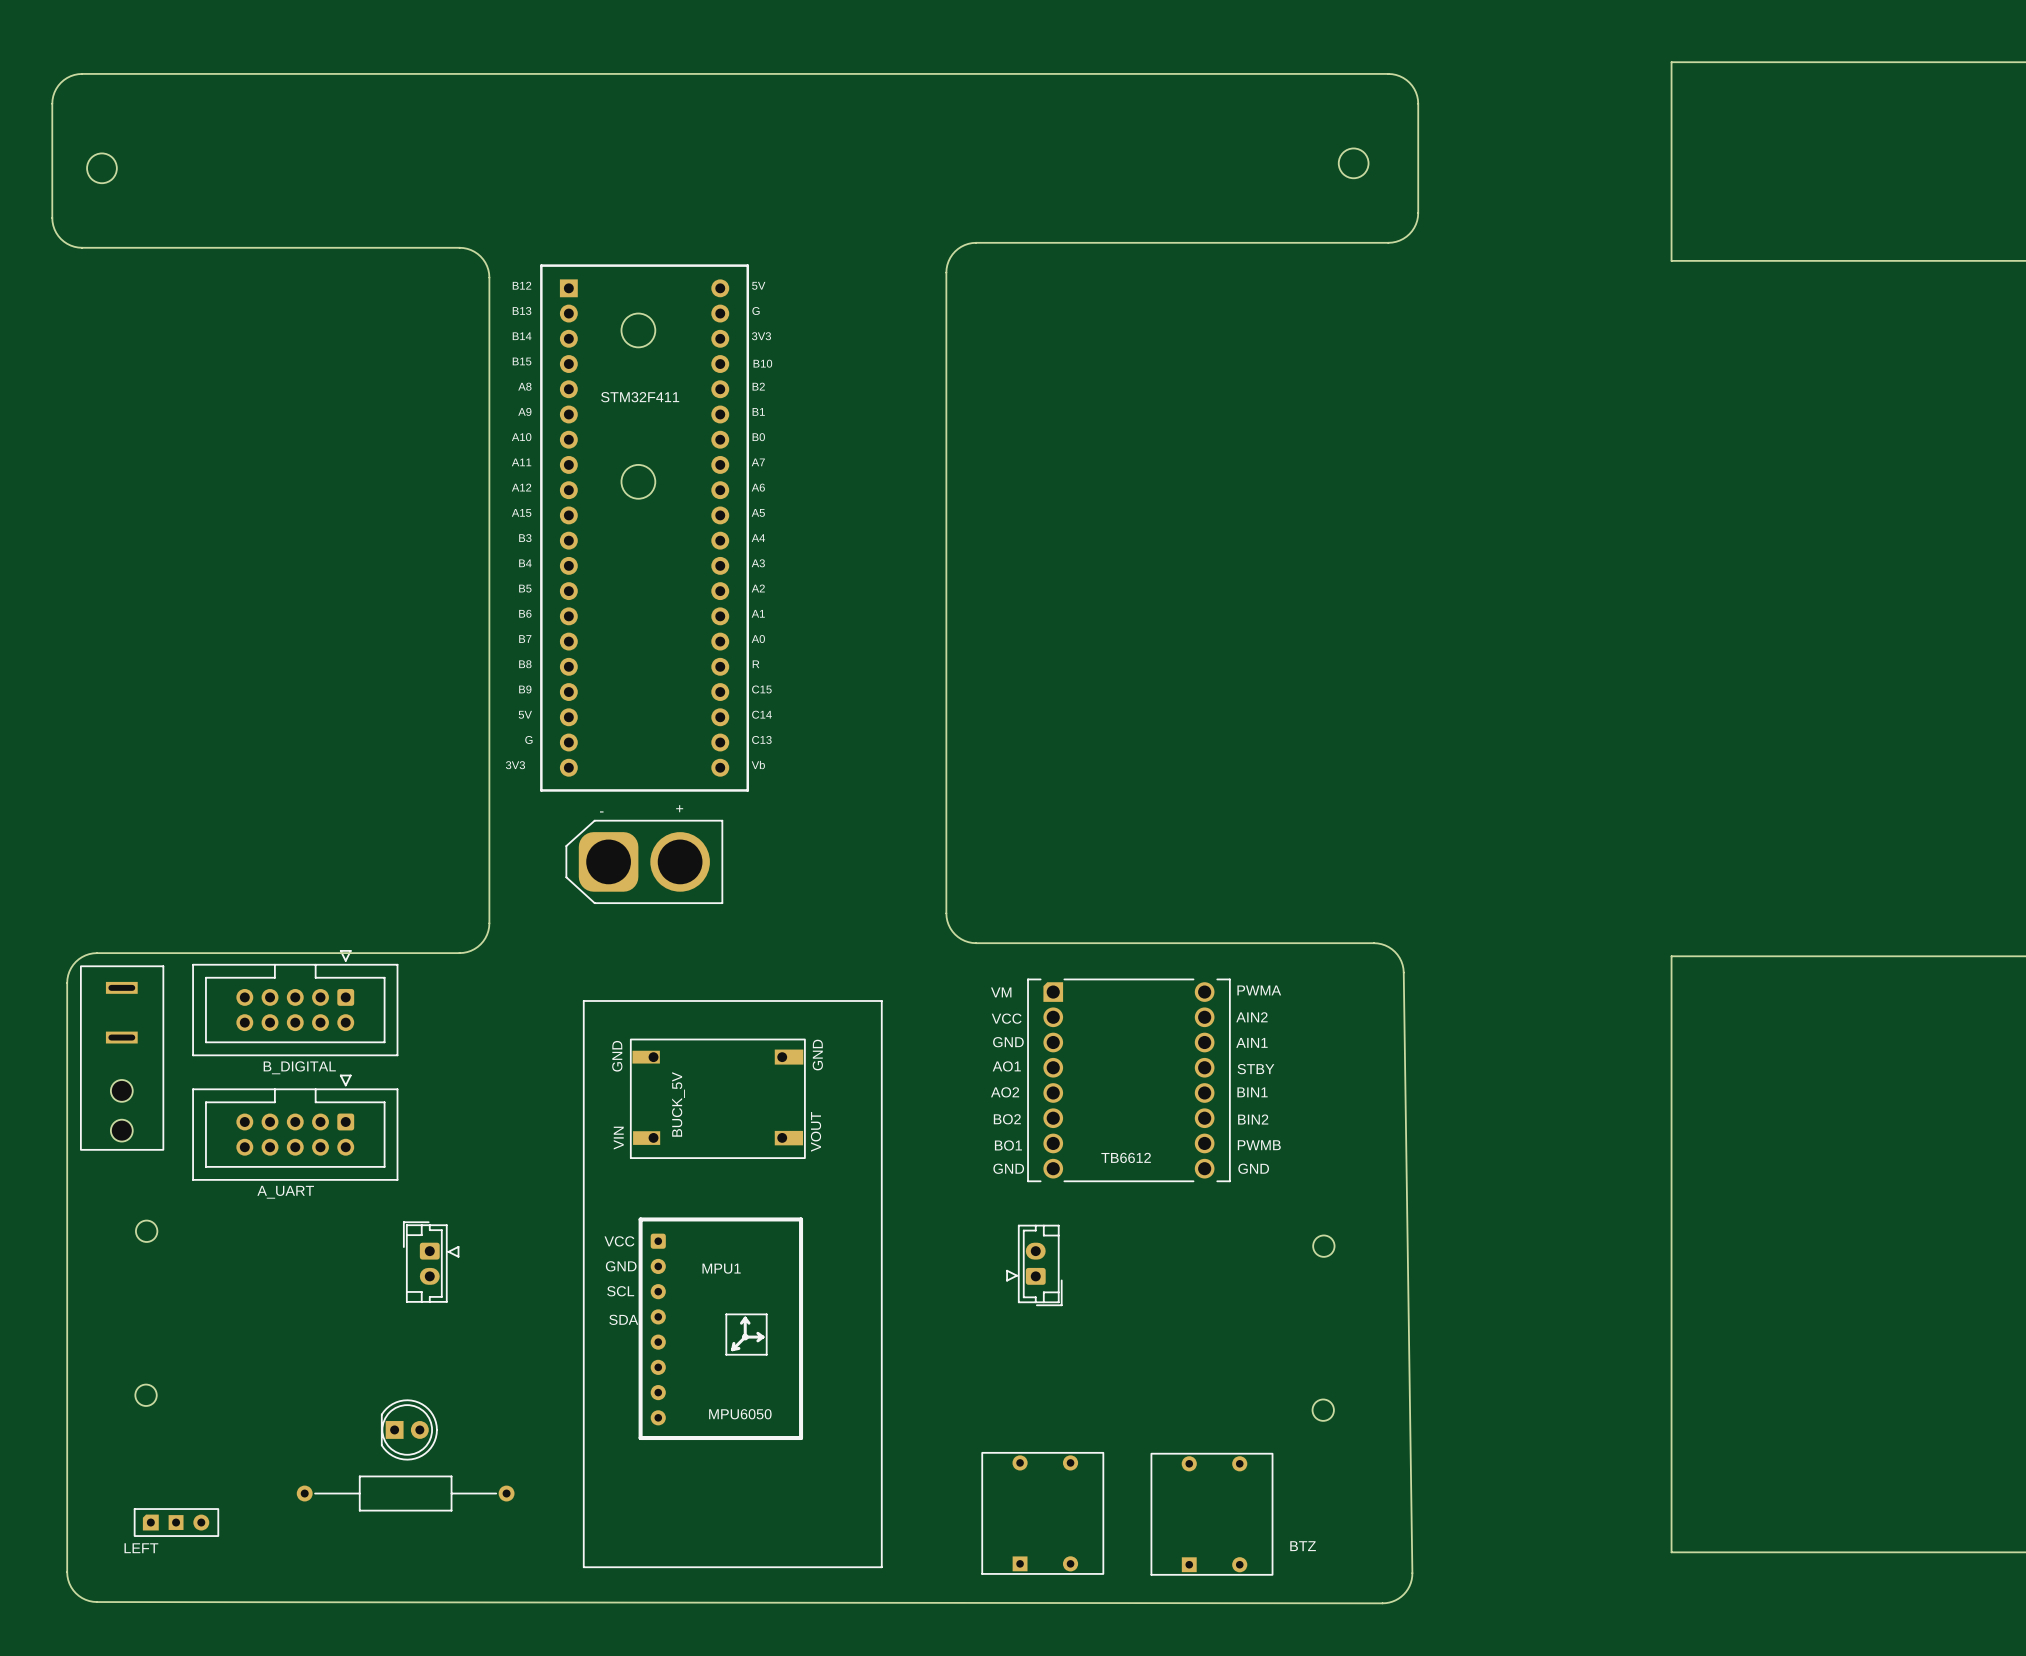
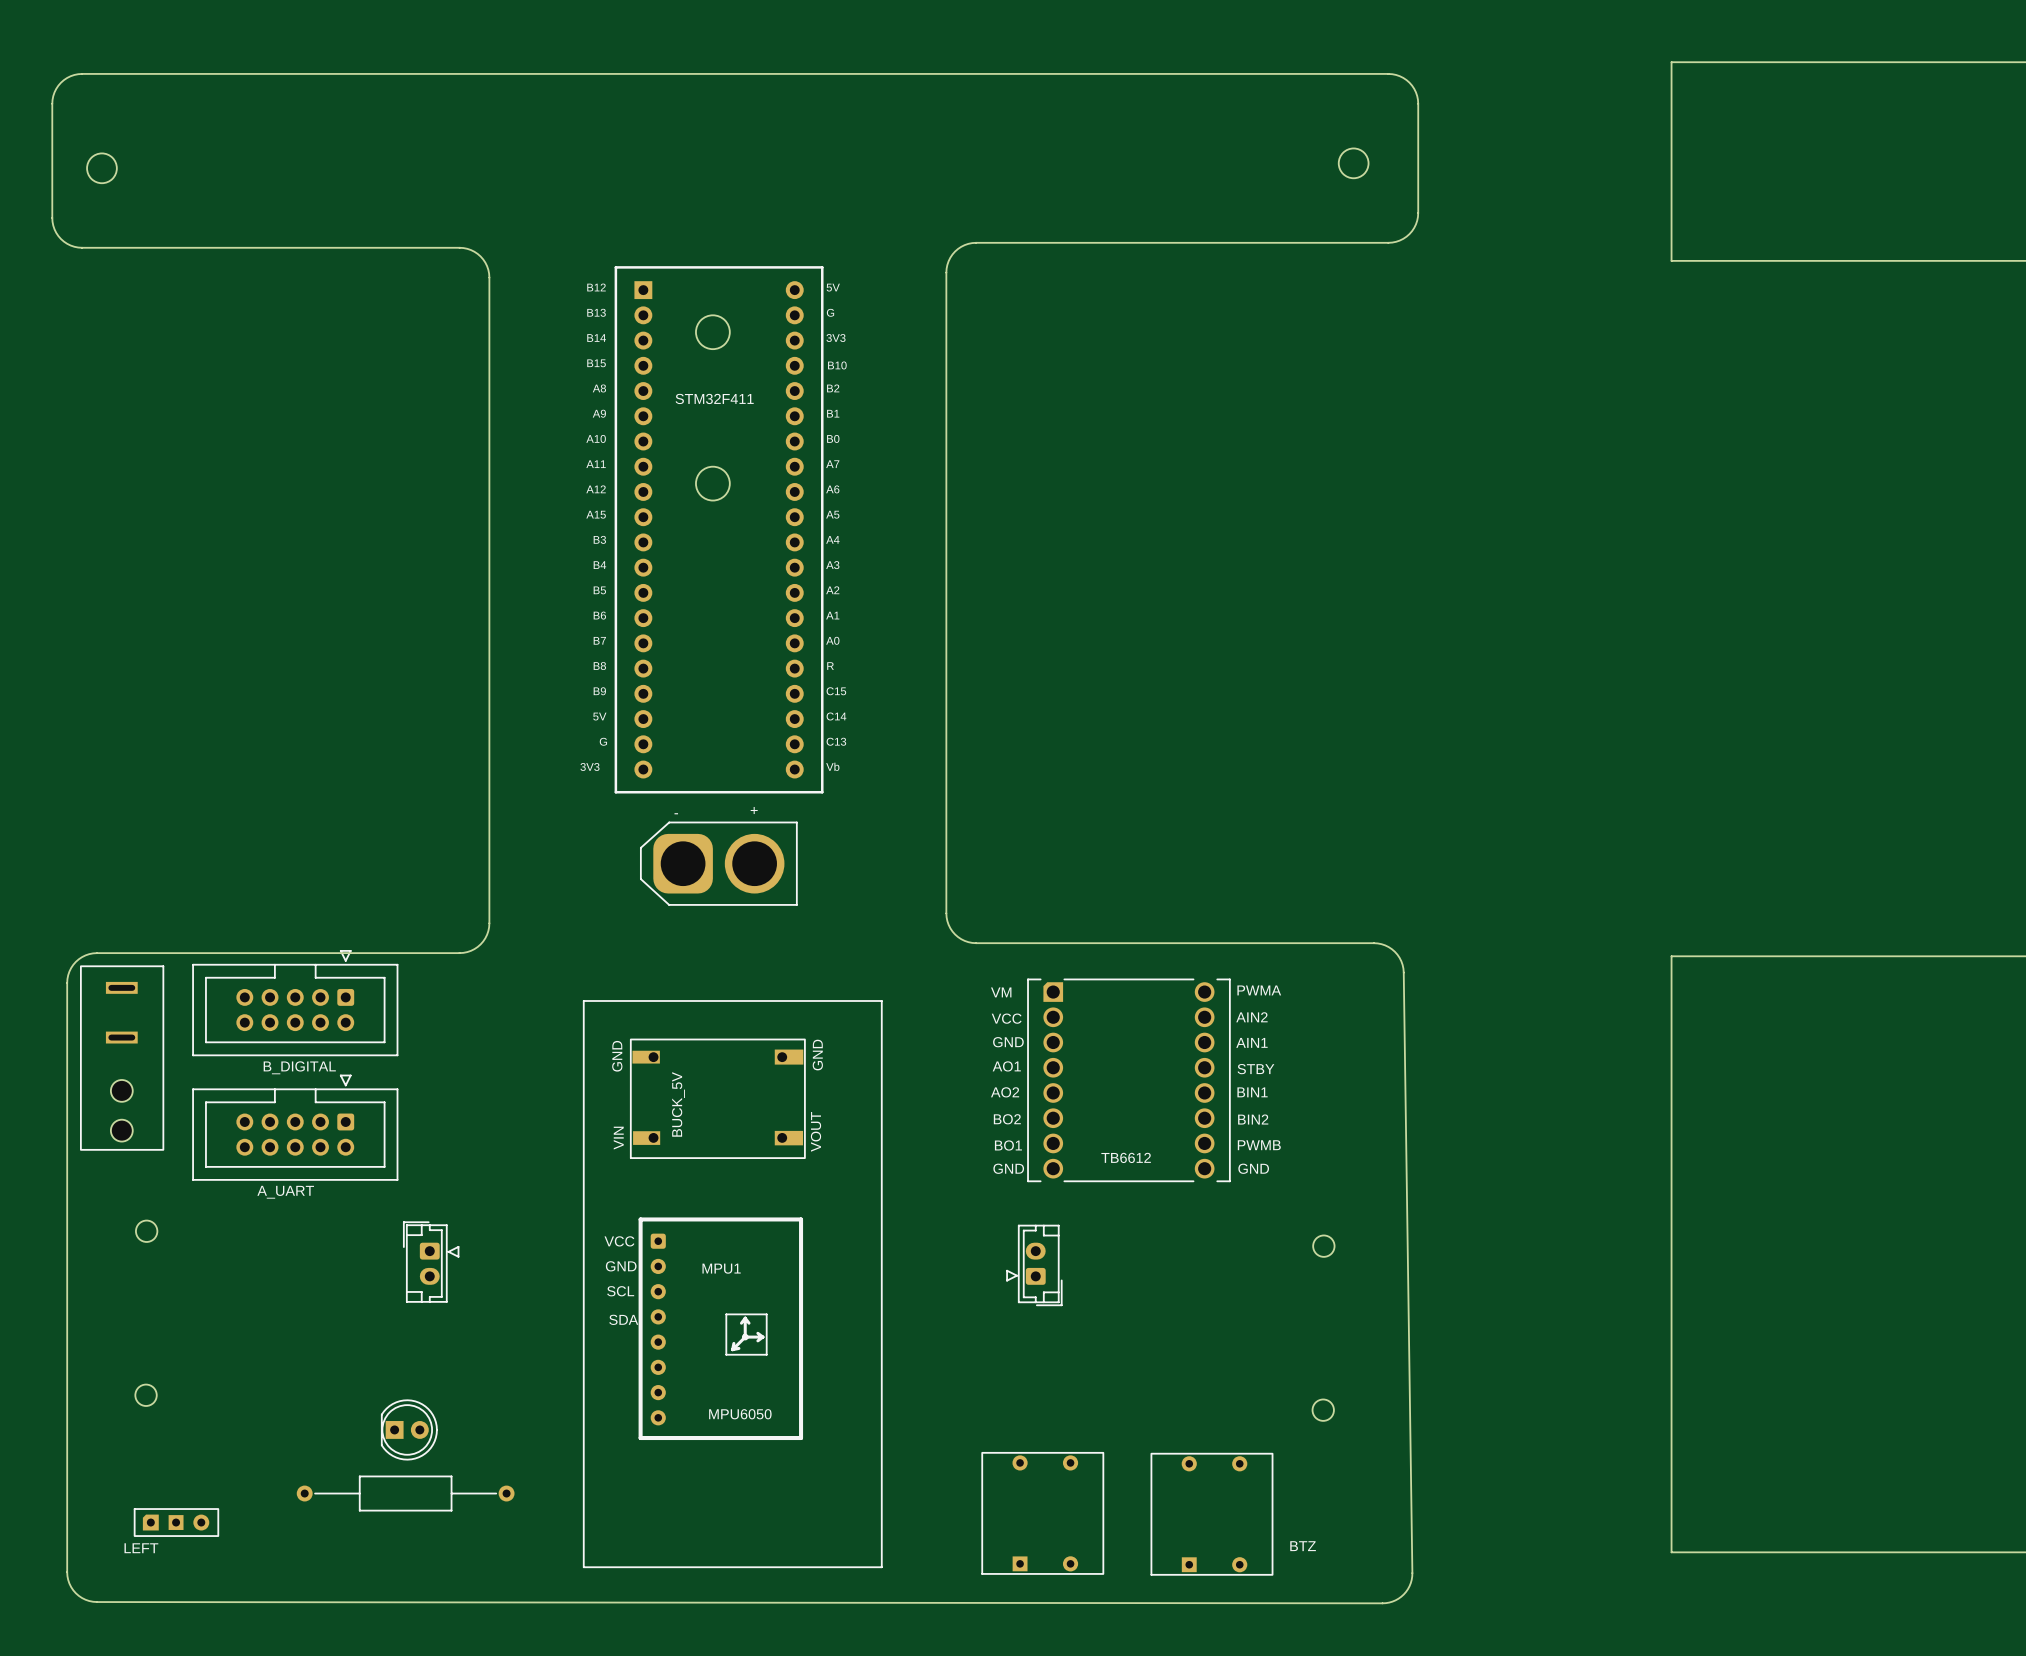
round board edge position: (638, 330) -> (712, 332)
round board edge position: (638, 481) -> (712, 483)
part position: (644, 528) -> (719, 529)
part position: (644, 861) -> (718, 863)

